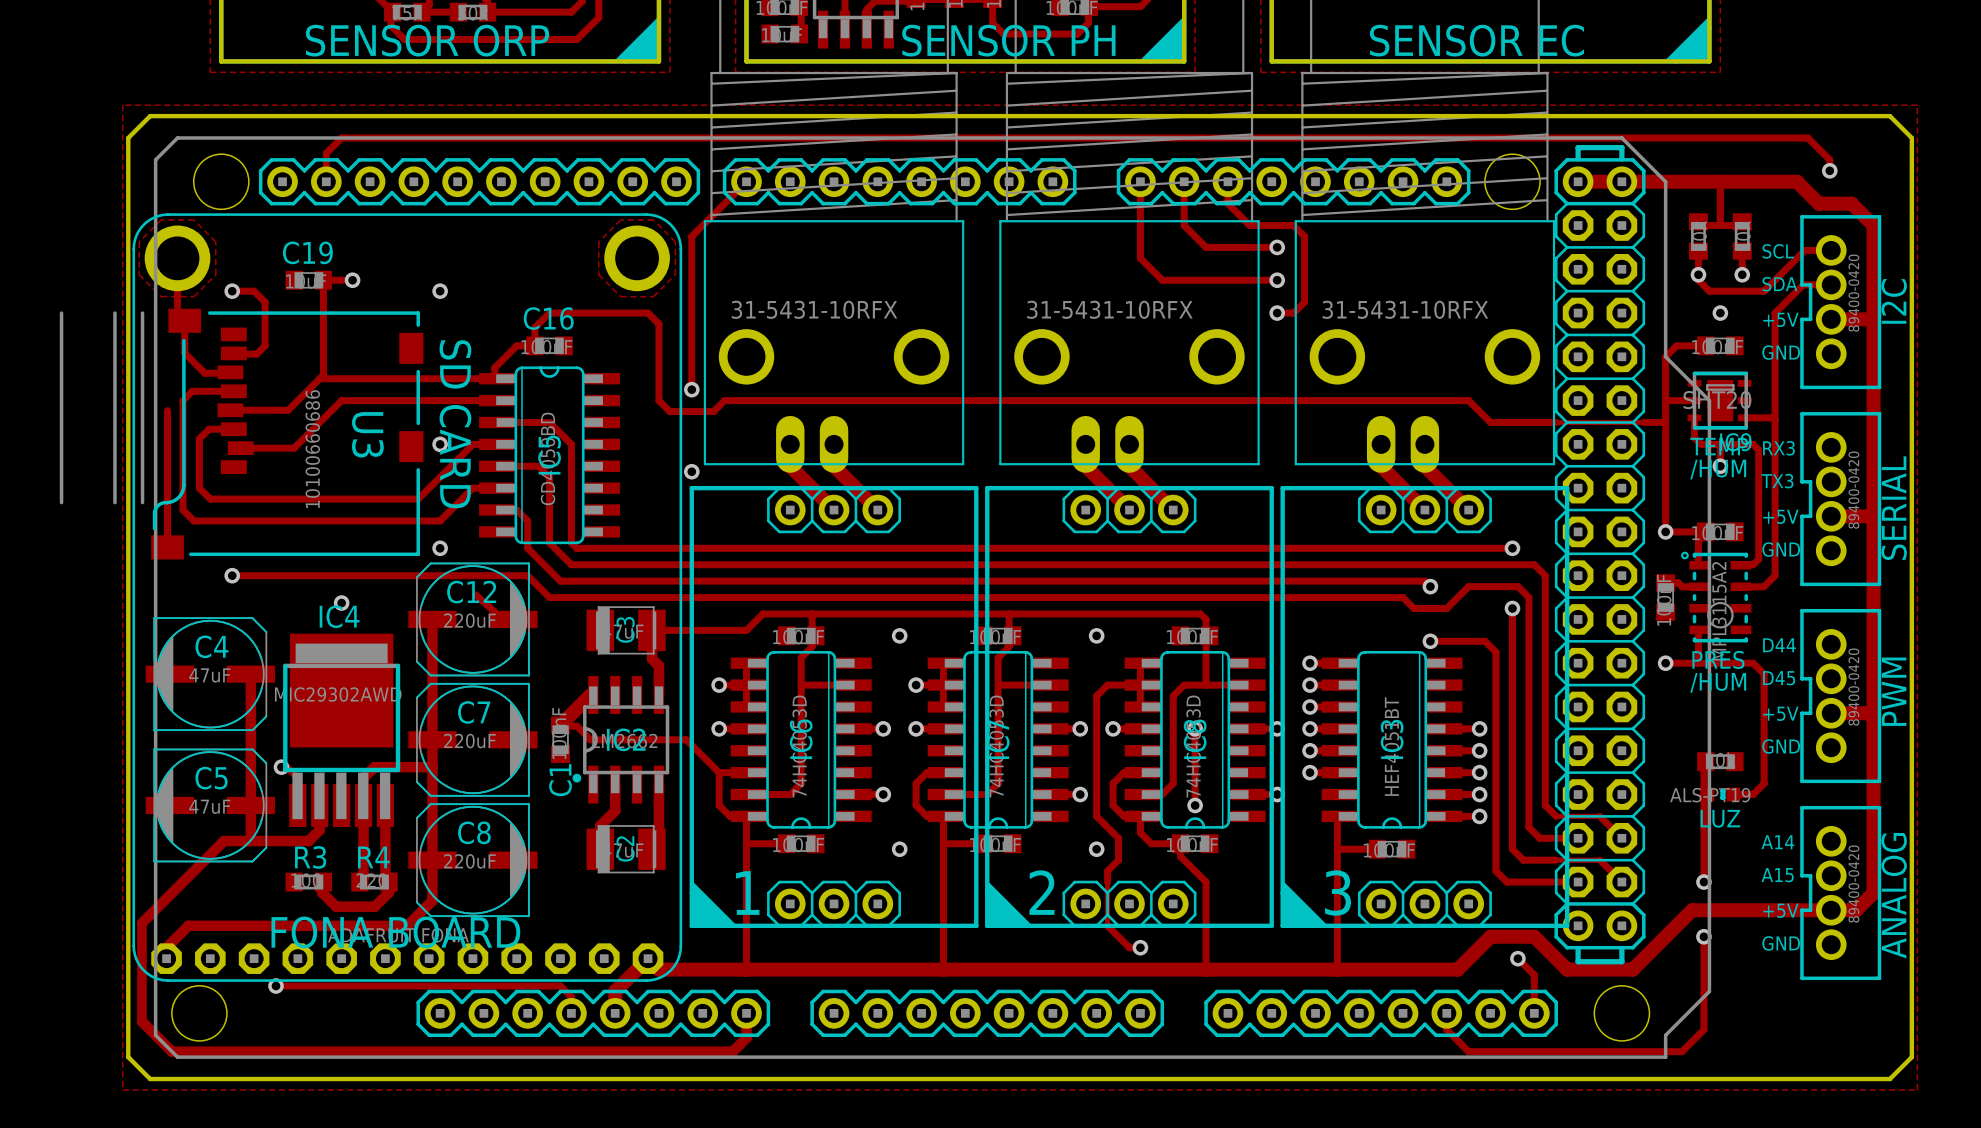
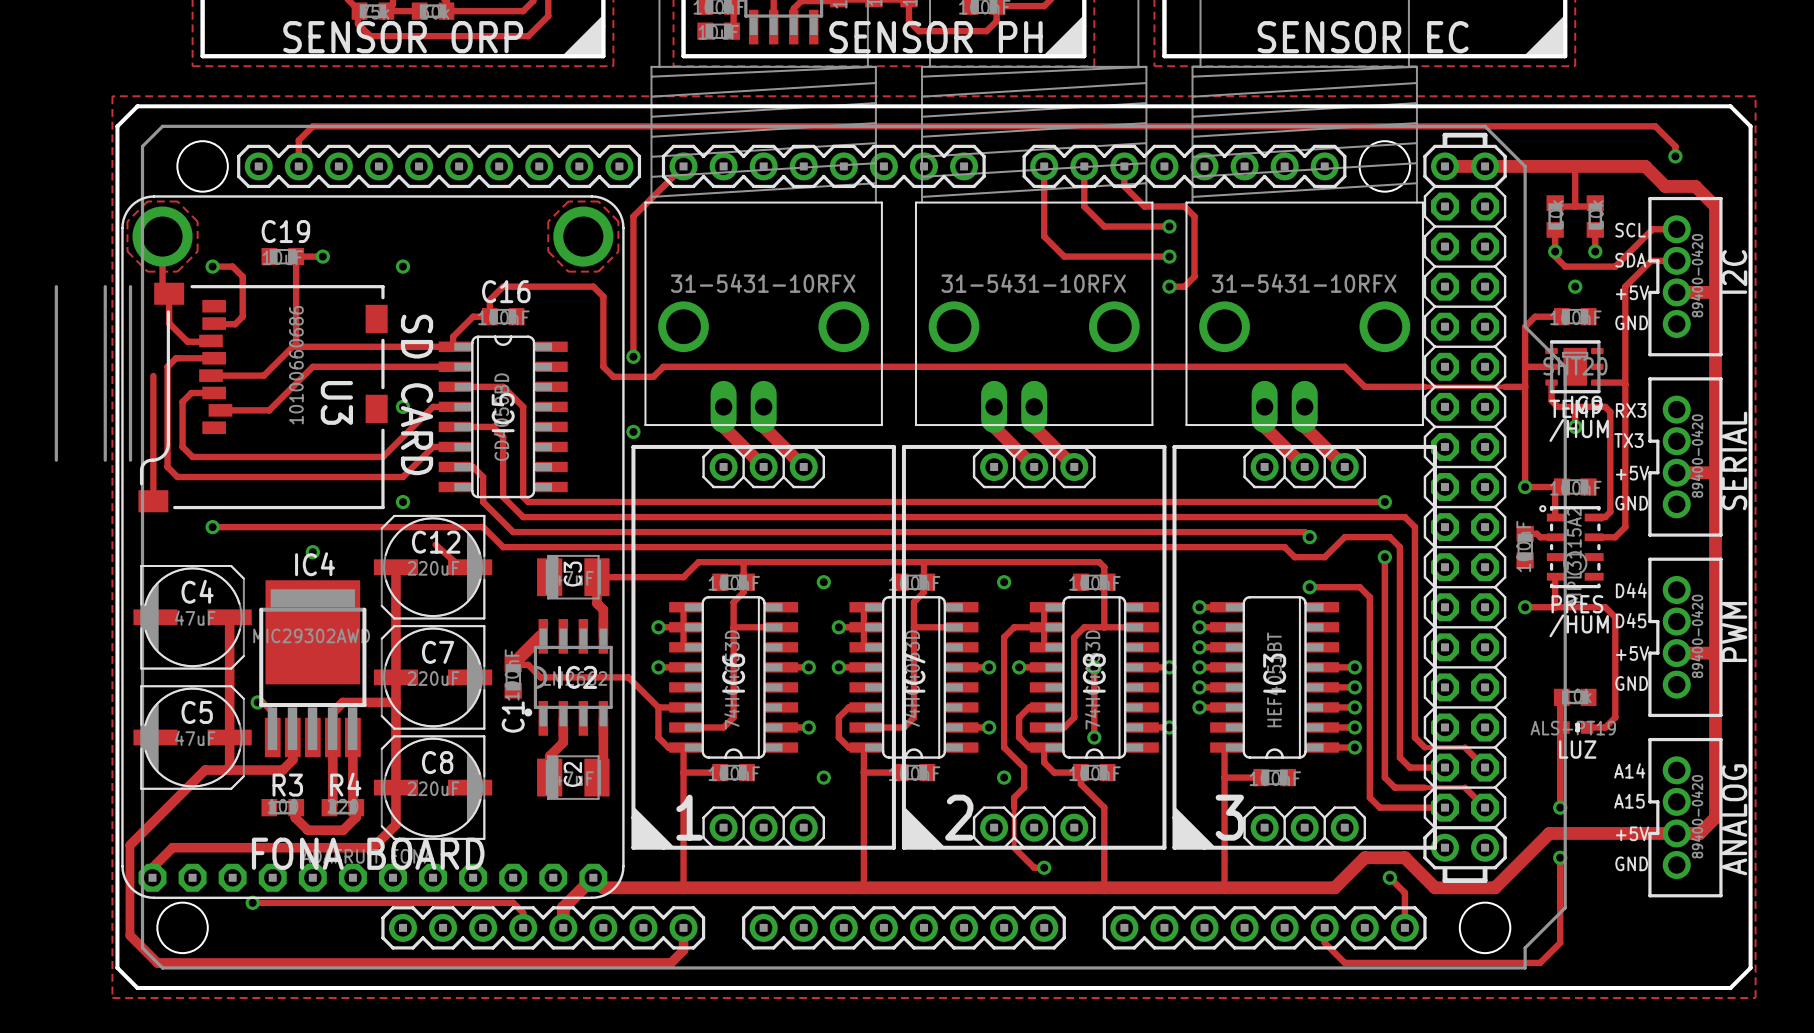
U3 value position: 10100660686 (312, 449) -> 10100660686 (296, 365)

